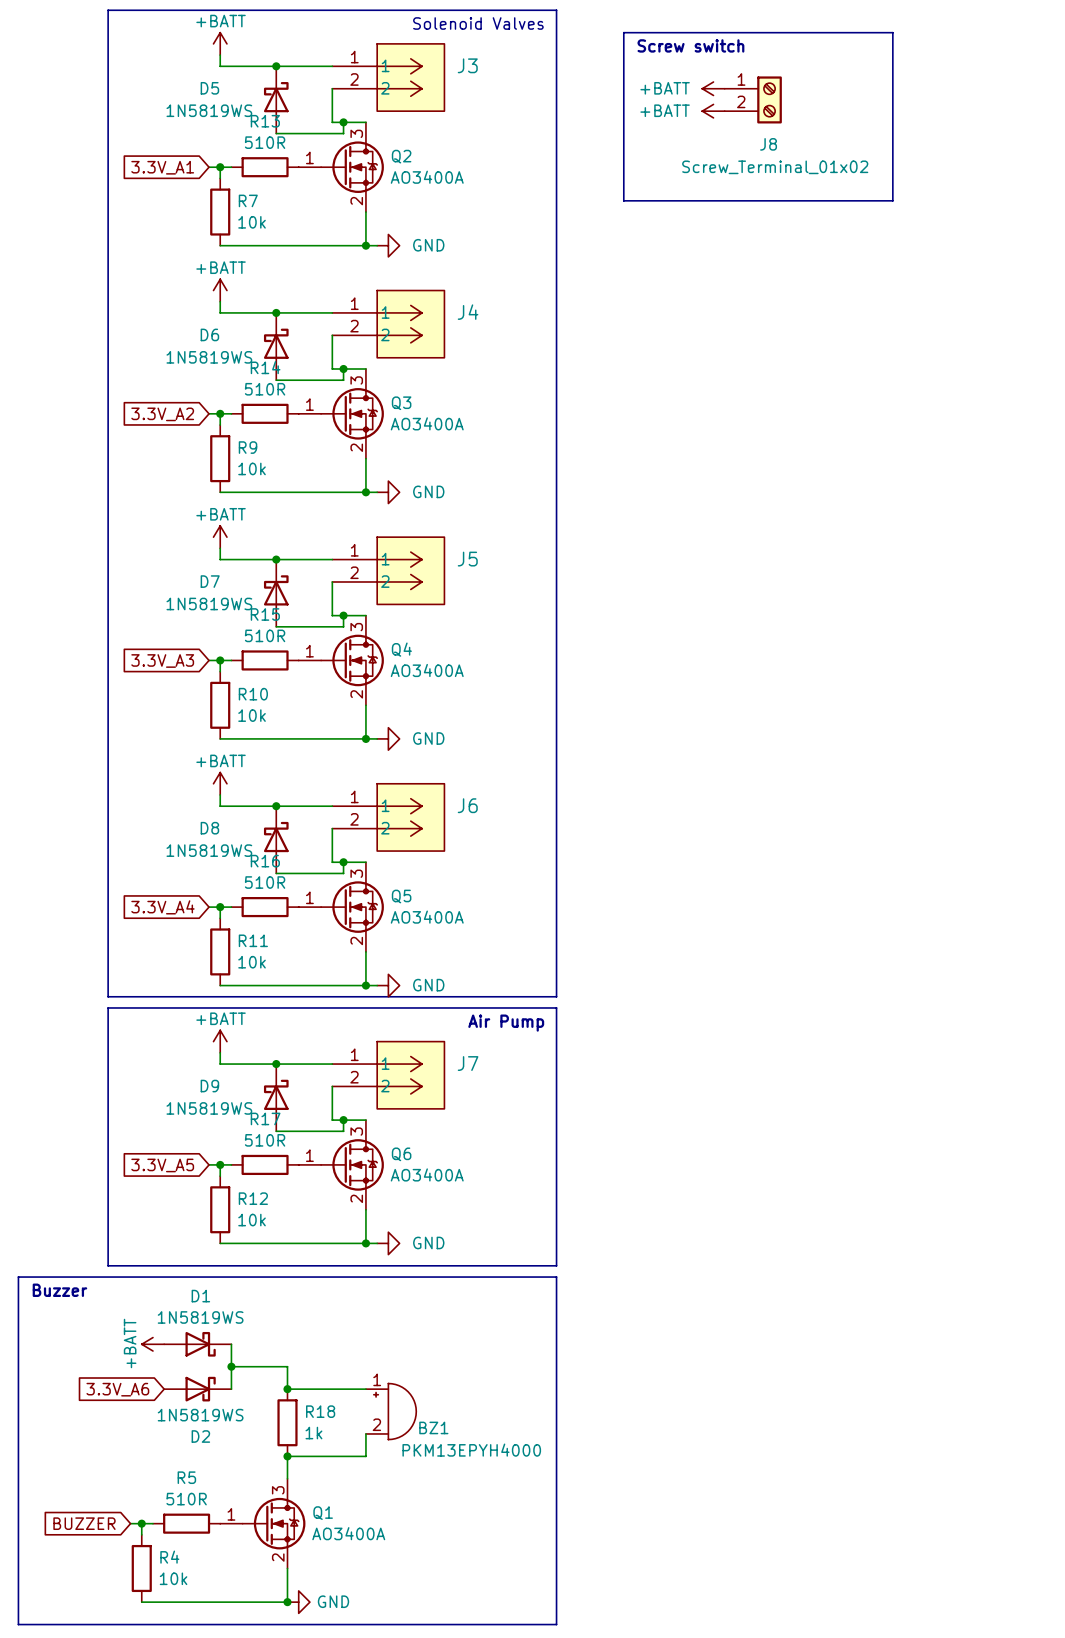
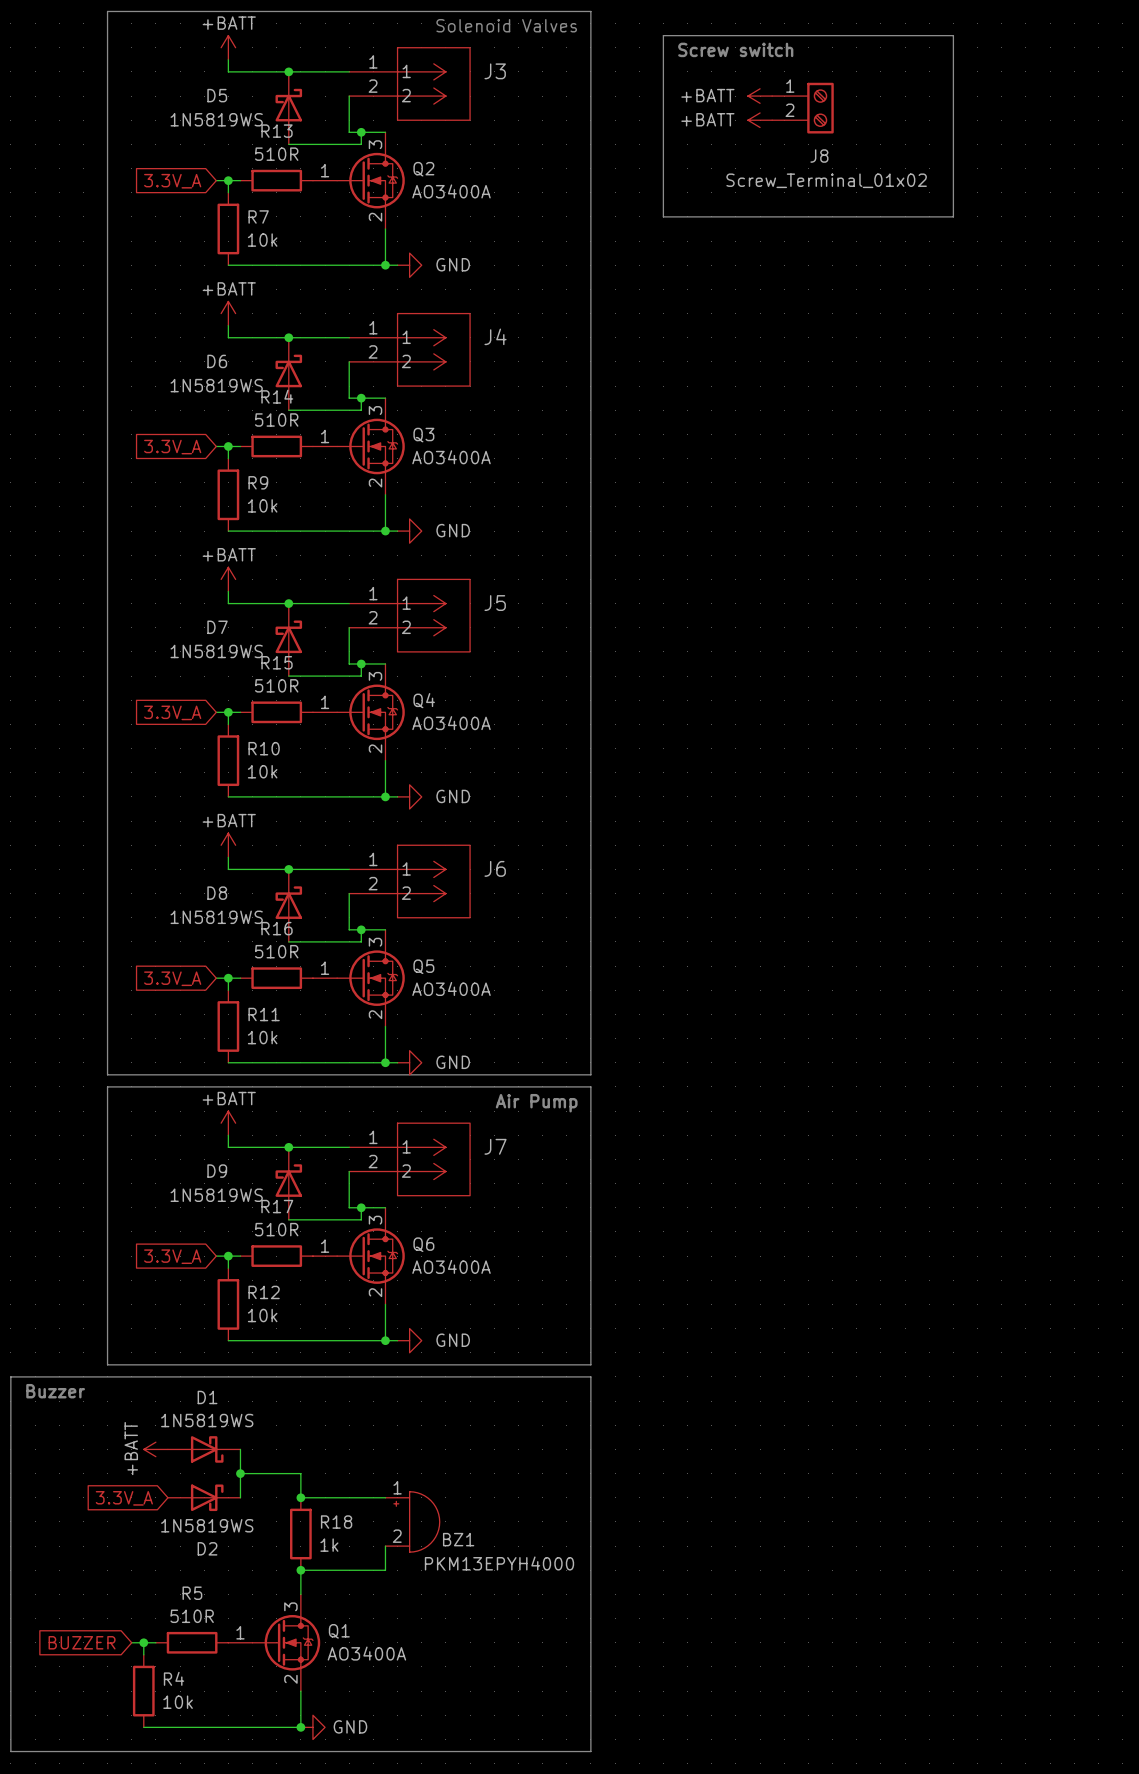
global label: 3.3V_A1 (162, 167) -> 3.3V_A (172, 181)
global label: 3.3V_A2 (162, 414) -> 3.3V_A (172, 447)
global label: 3.3V_A3 (162, 661) -> 3.3V_A (172, 712)
global label: 3.3V_A4 (162, 907) -> 3.3V_A (172, 978)
global label: 3.3V_A5 (162, 1165) -> 3.3V_A (172, 1256)
global label: 3.3V_A6 (117, 1389) -> 3.3V_A (124, 1498)

